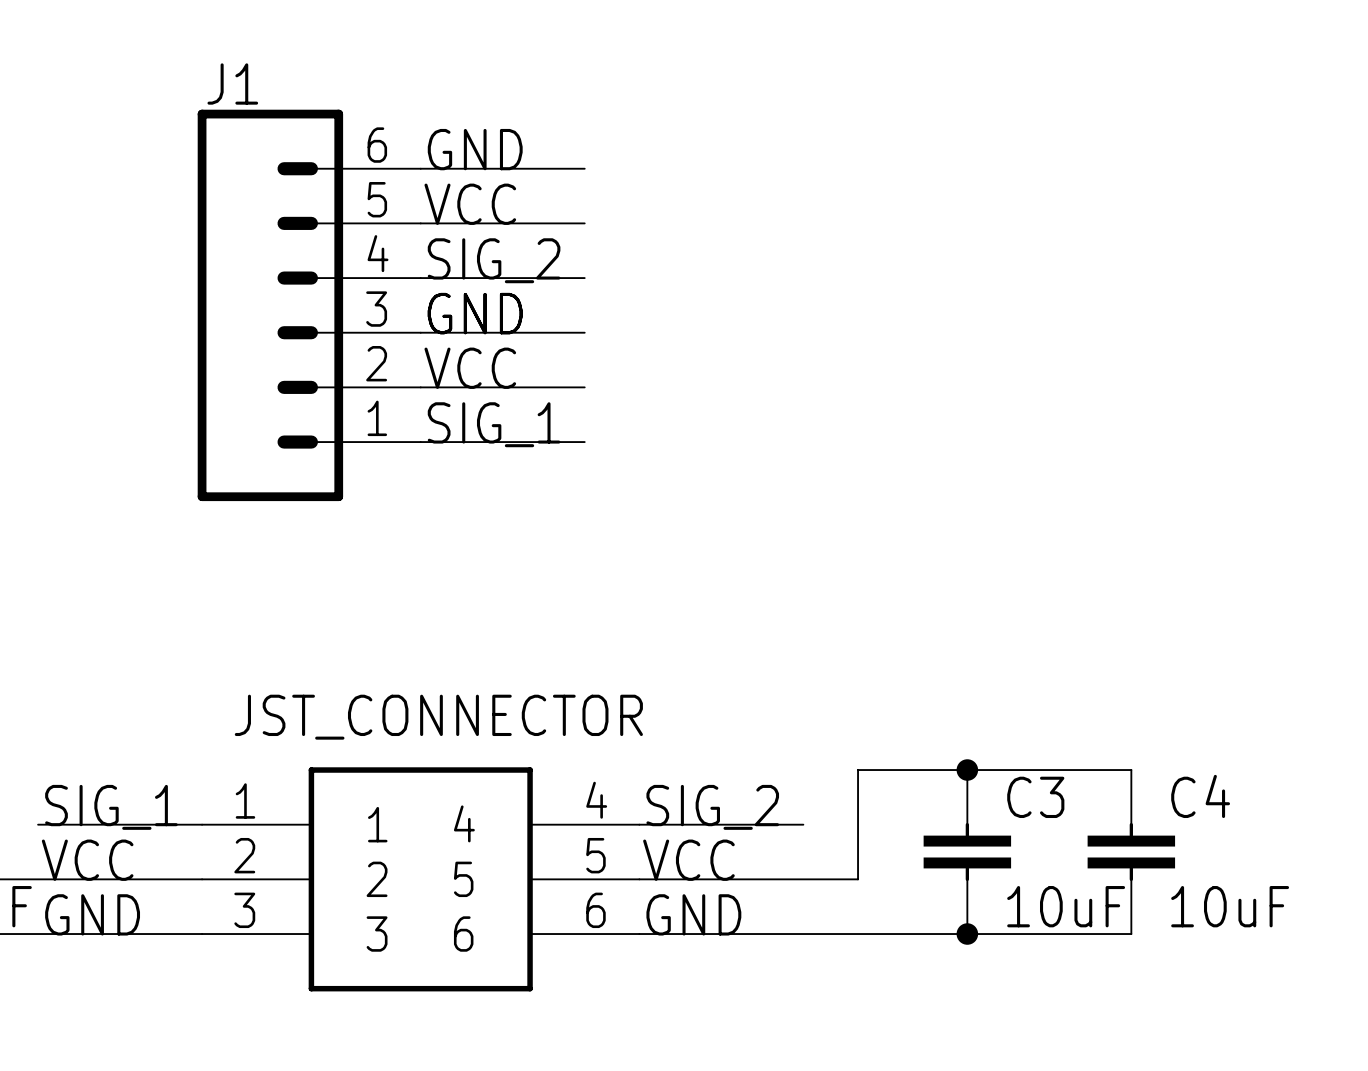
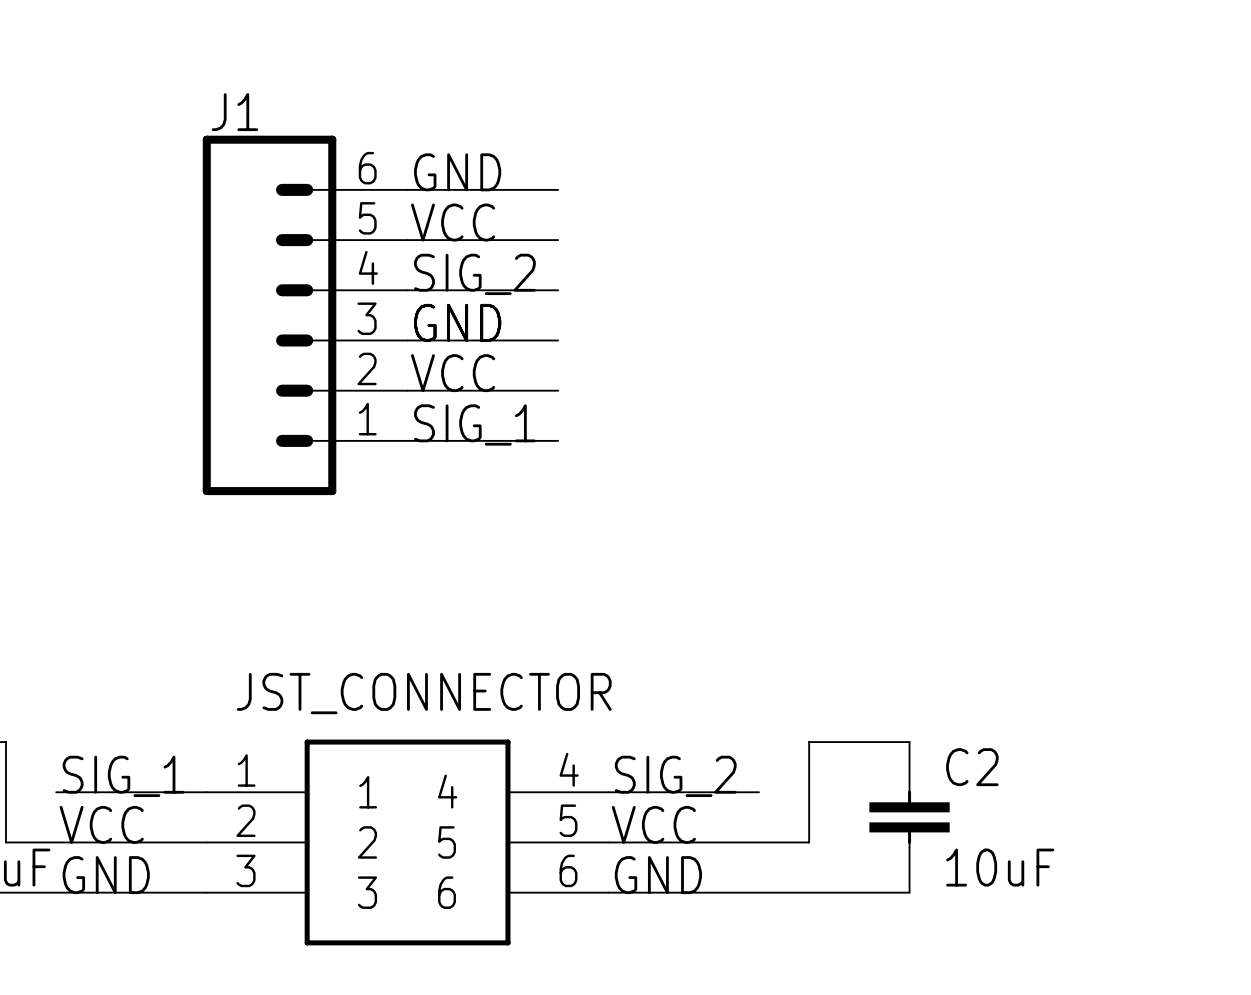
wire: (967, 770) (1131, 770) -> none
junction: (967, 770) -> none
C3 name: C3 (1035, 797) -> C2 (972, 767)
C4: 10uF (1131, 852) -> none
wire: (967, 934) (1131, 934) -> none
junction: (967, 934) -> none

